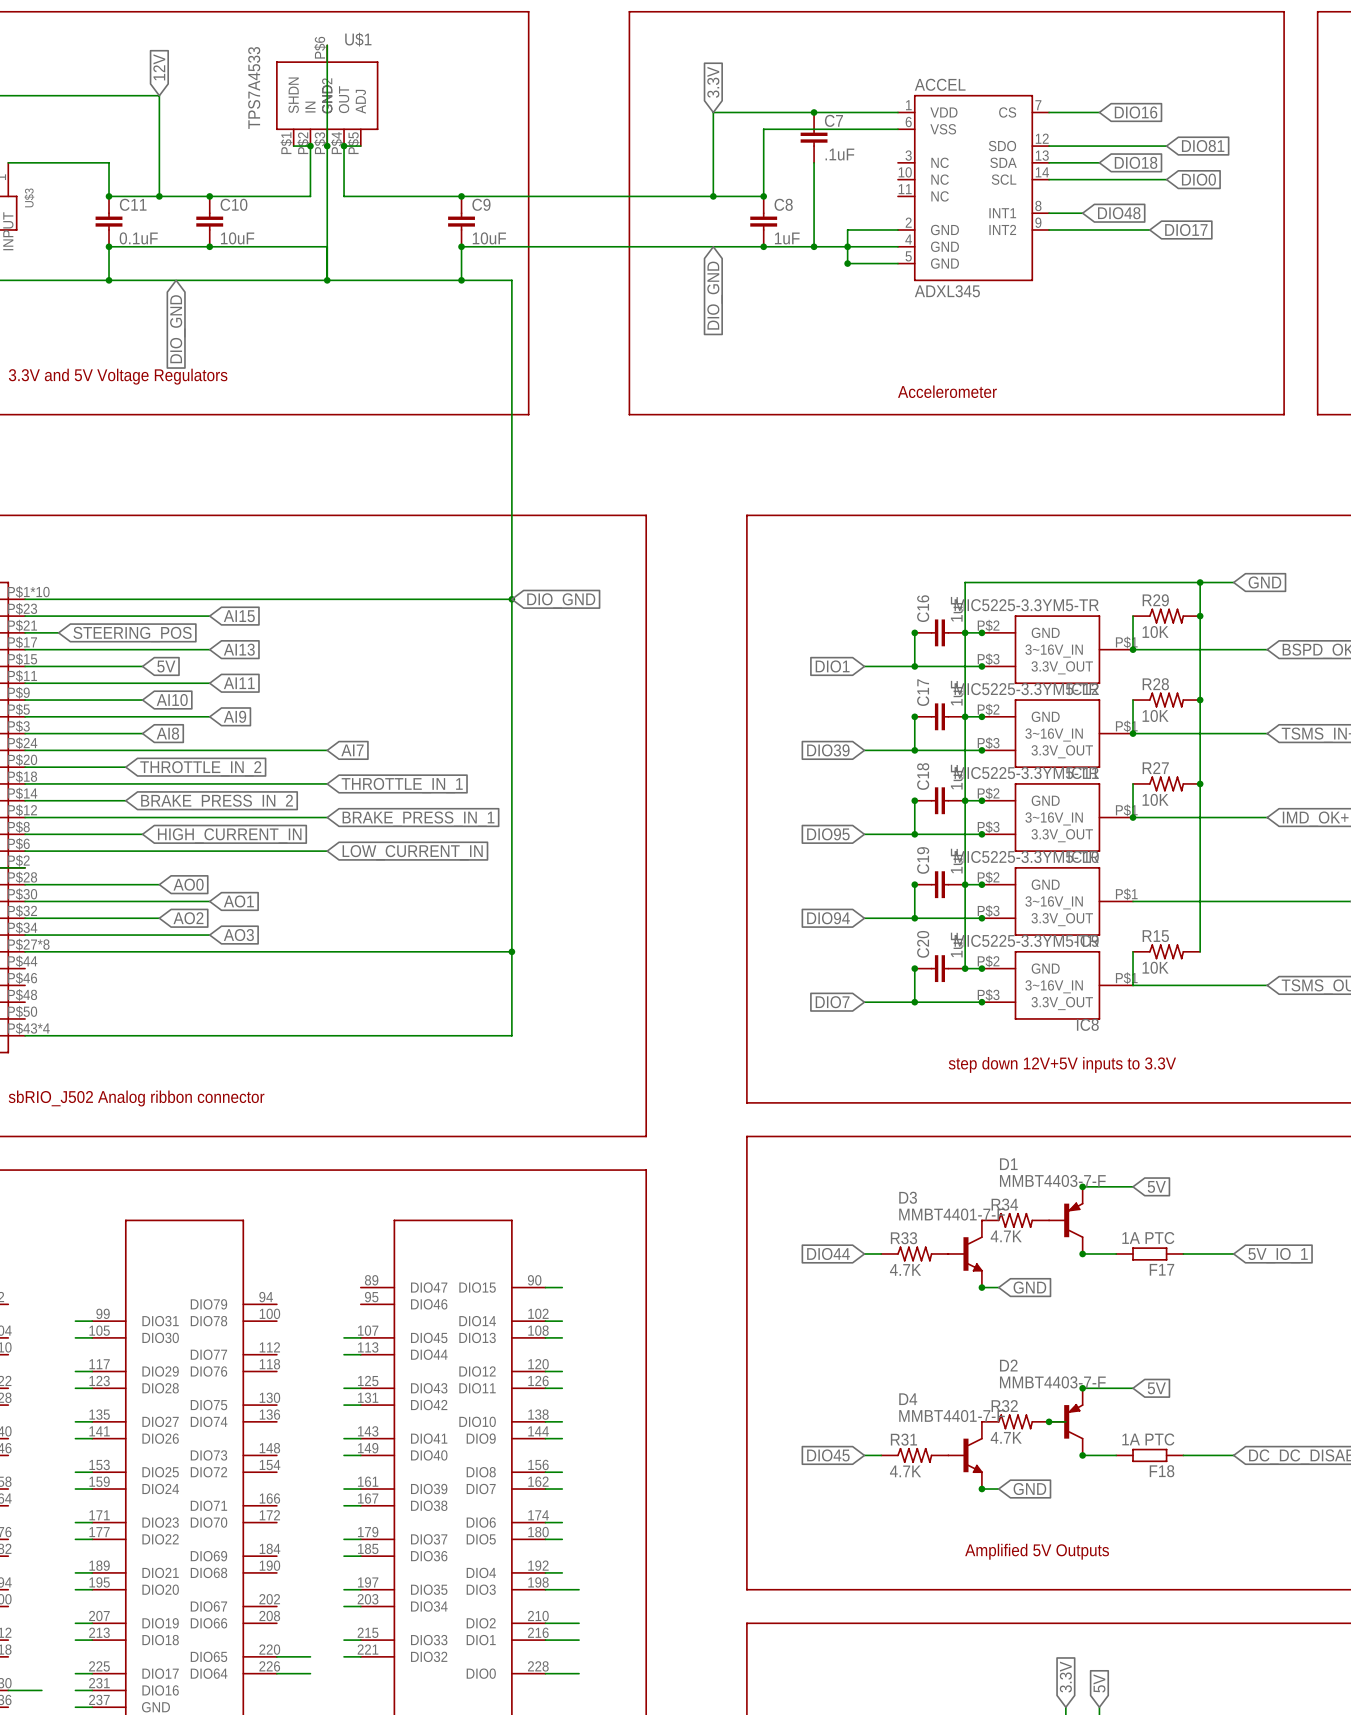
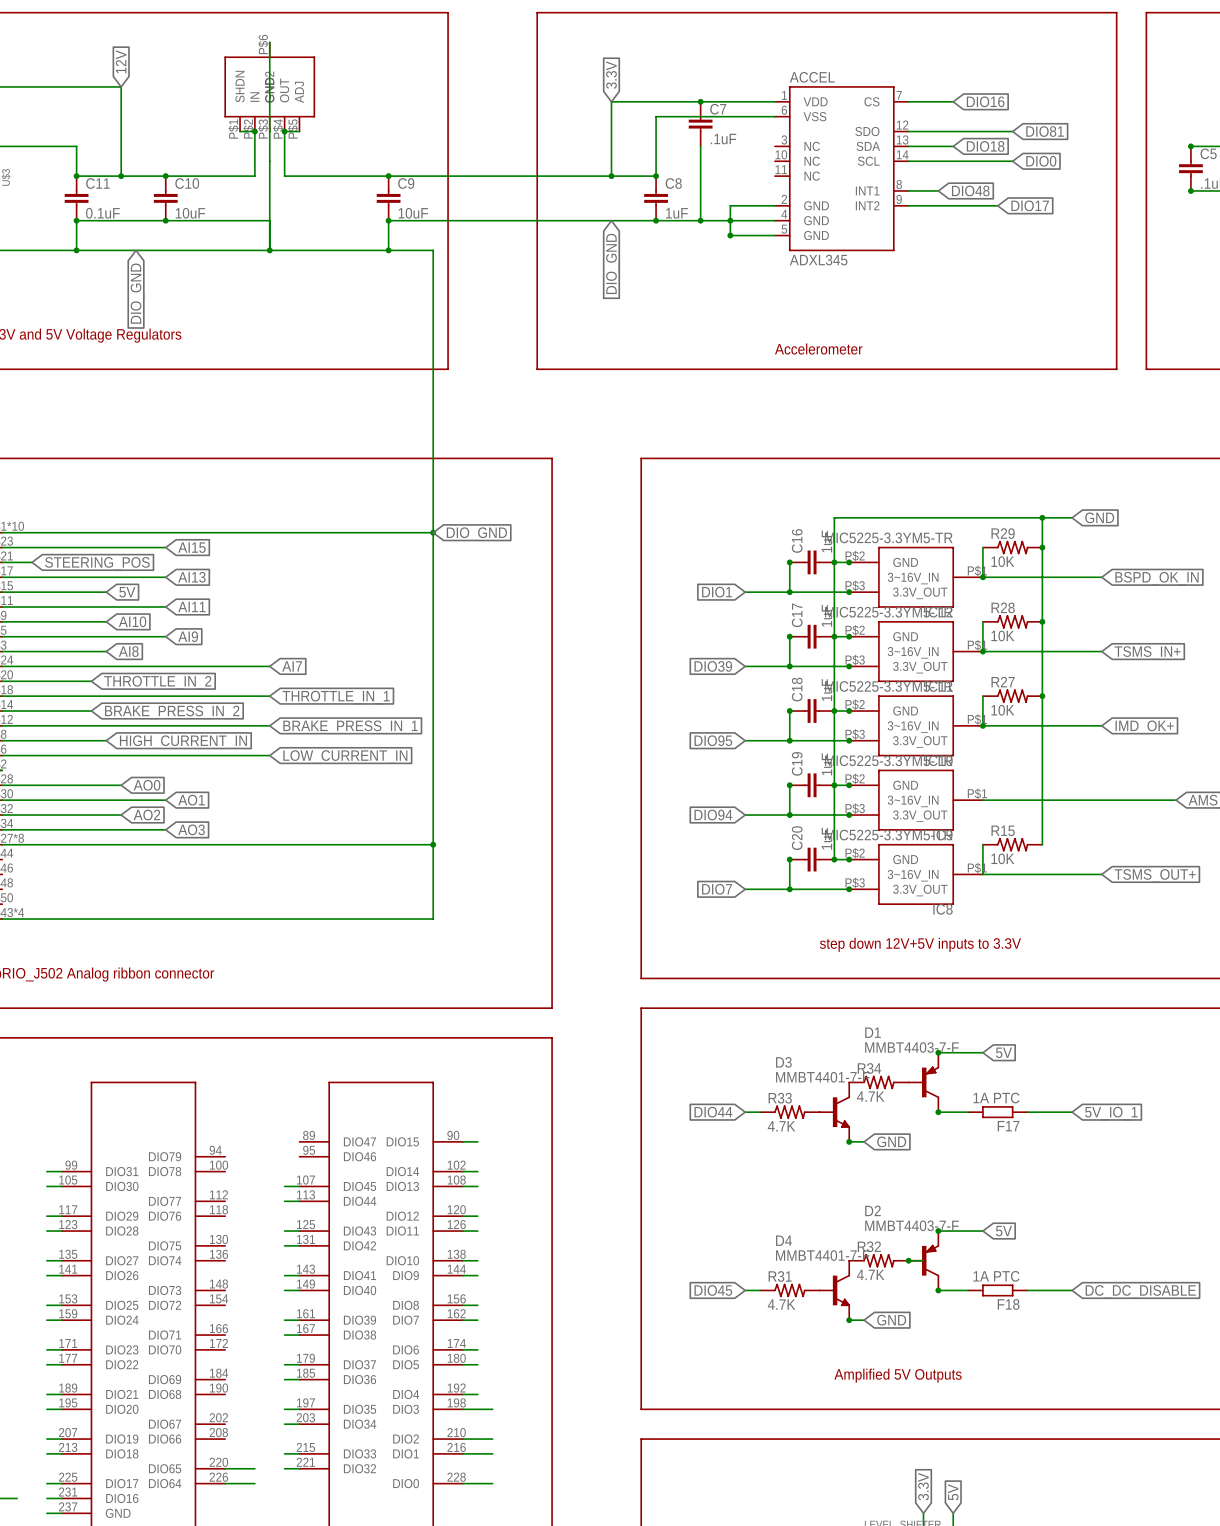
U$1 name: U$1 (358, 39) -> none
U$1 value: TPS7A4533 (254, 87) -> none
junction: (327, 146) -> none

